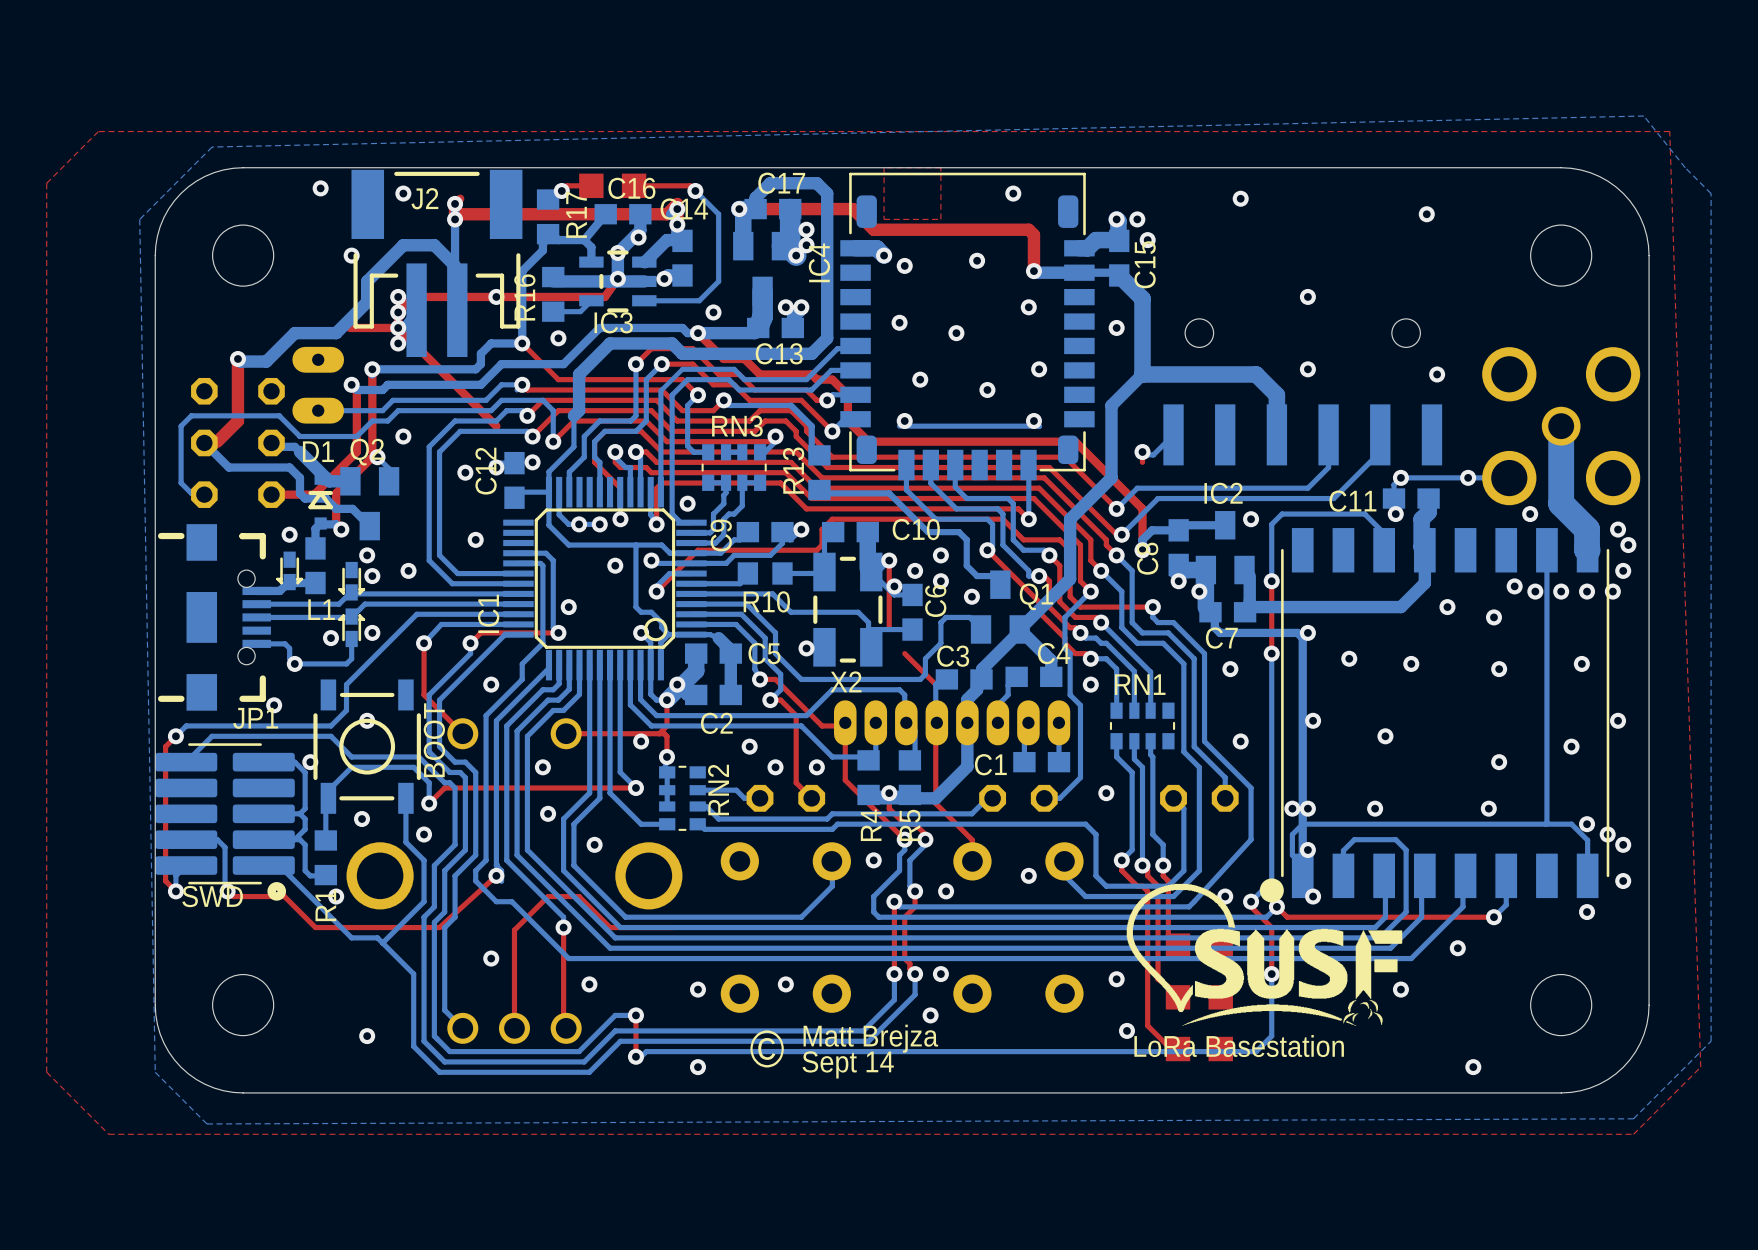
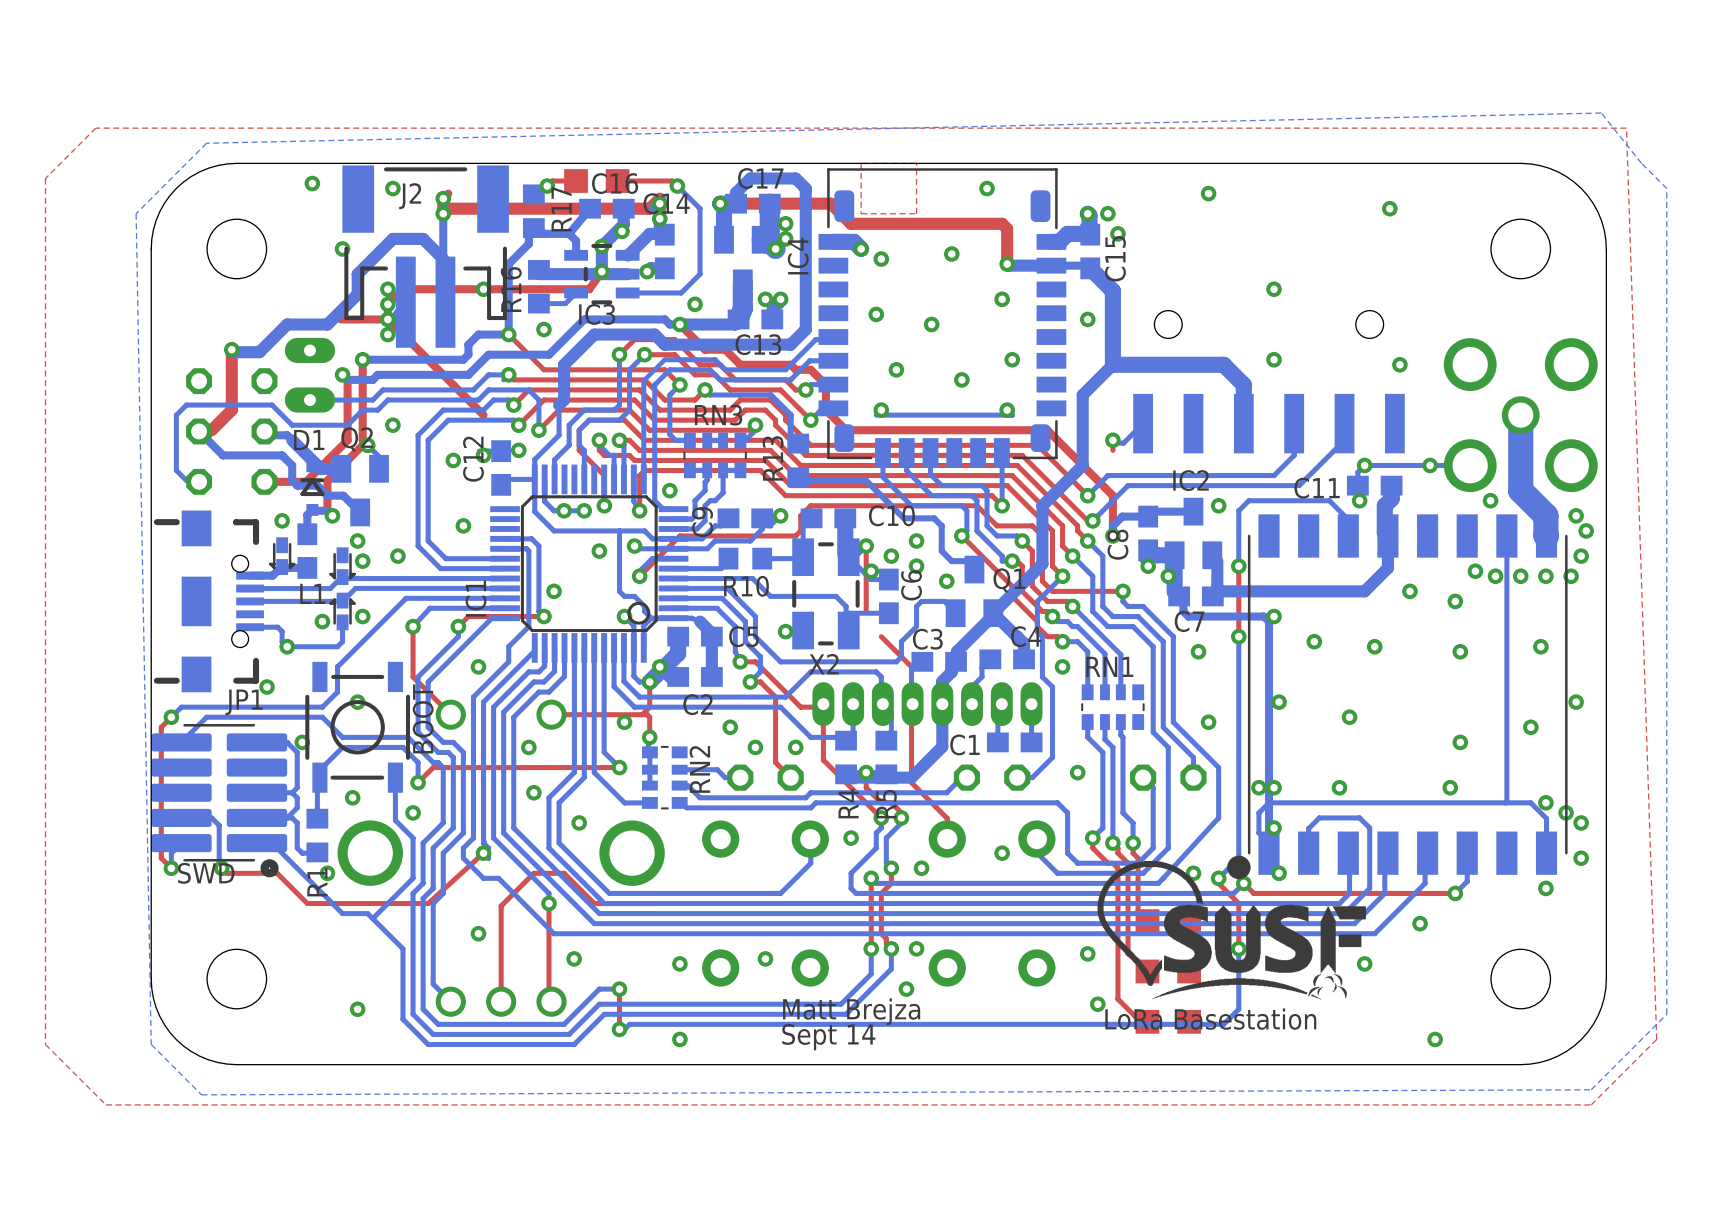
text: © (767, 1048) -> none

